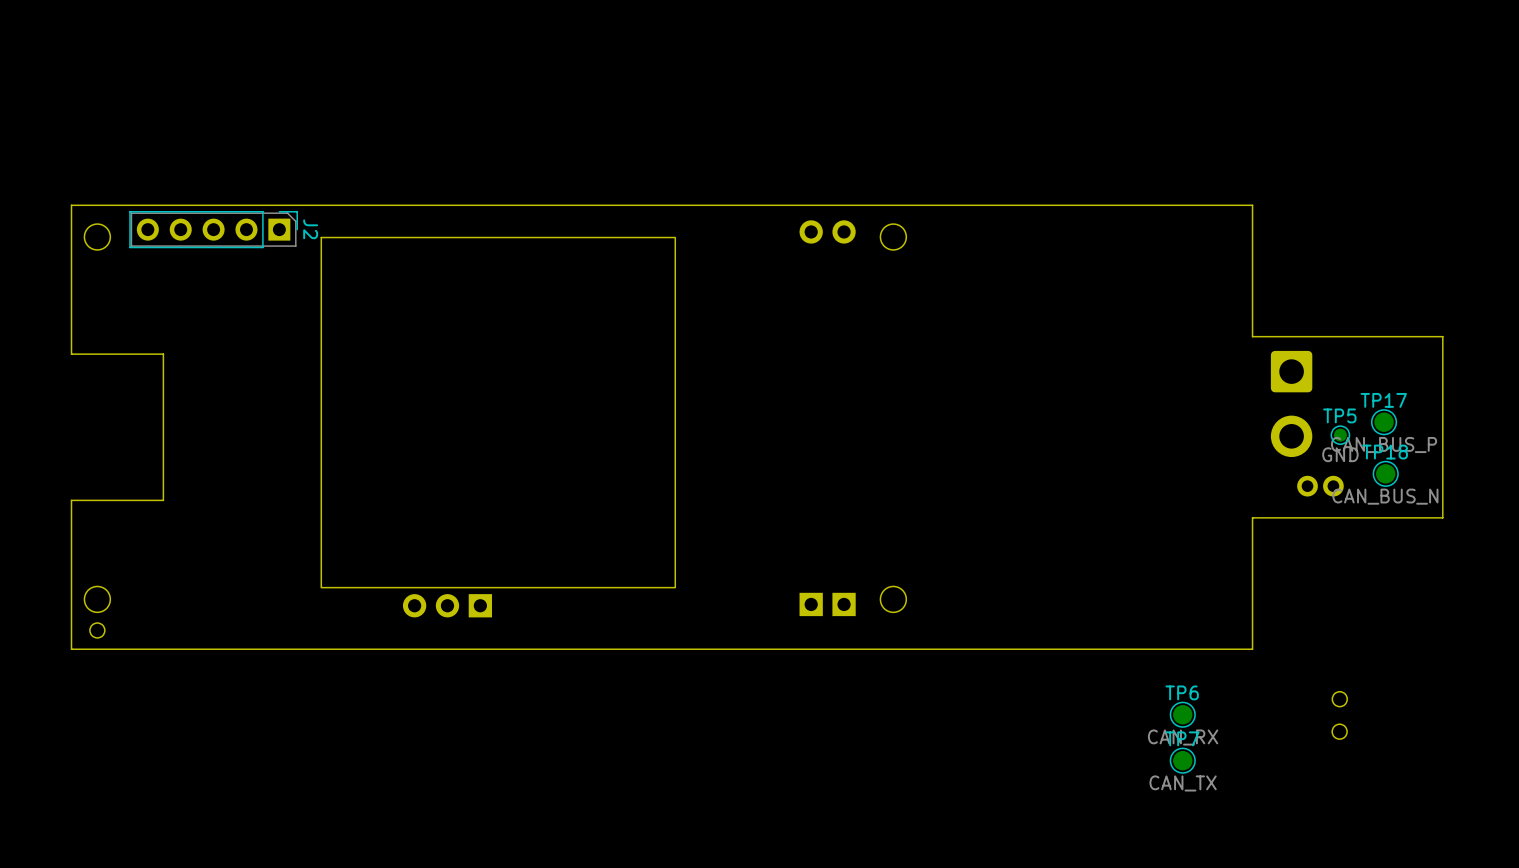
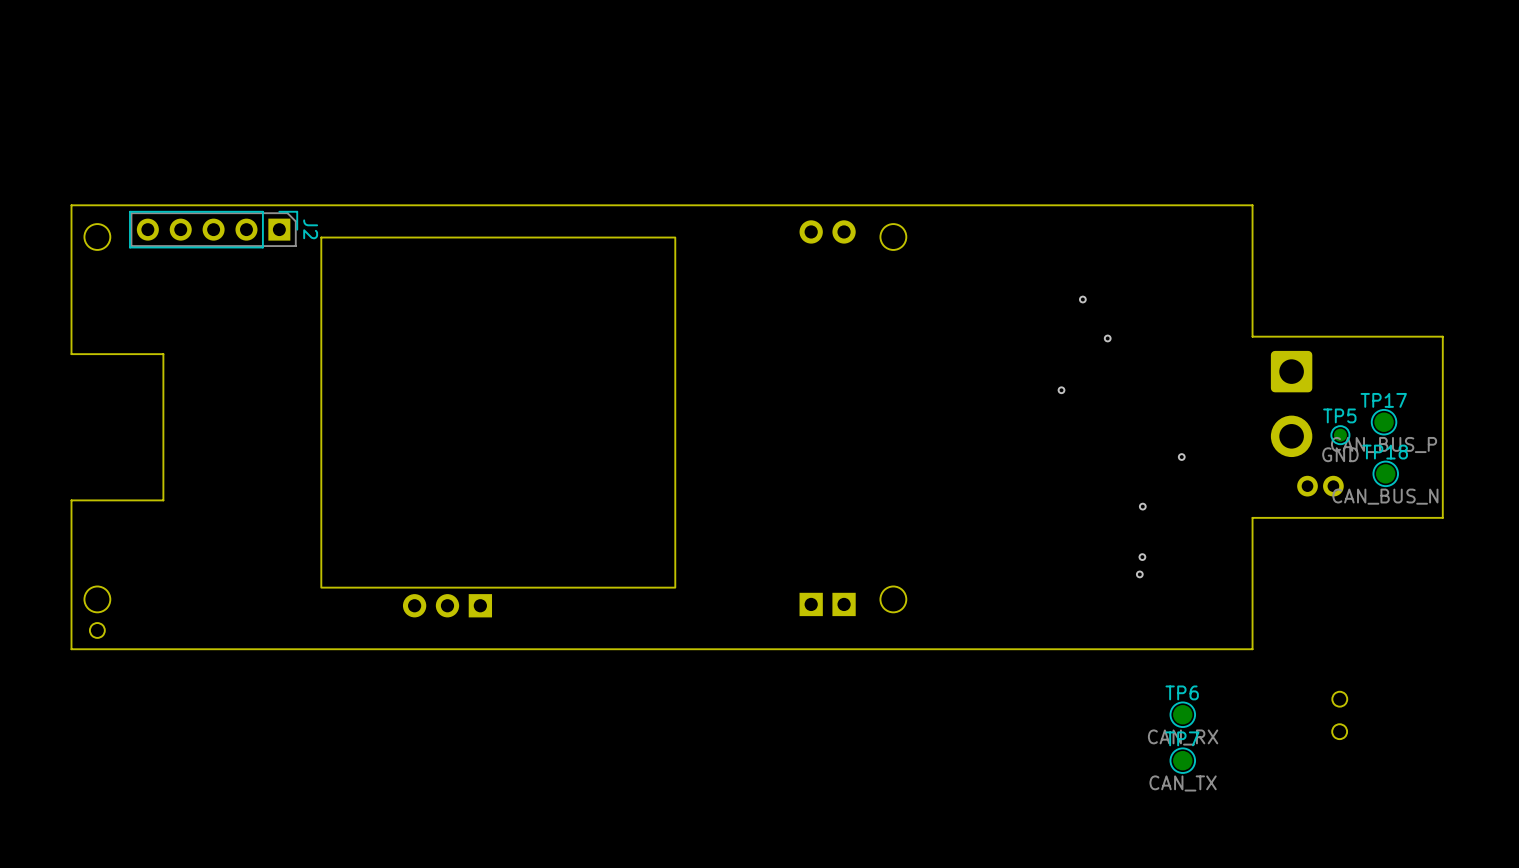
via: none -> (1082, 299)
via: none -> (1107, 338)
via: none -> (1061, 390)
via: none -> (1181, 457)
via: none -> (1142, 506)
via: none -> (1142, 557)
via: none -> (1139, 574)

